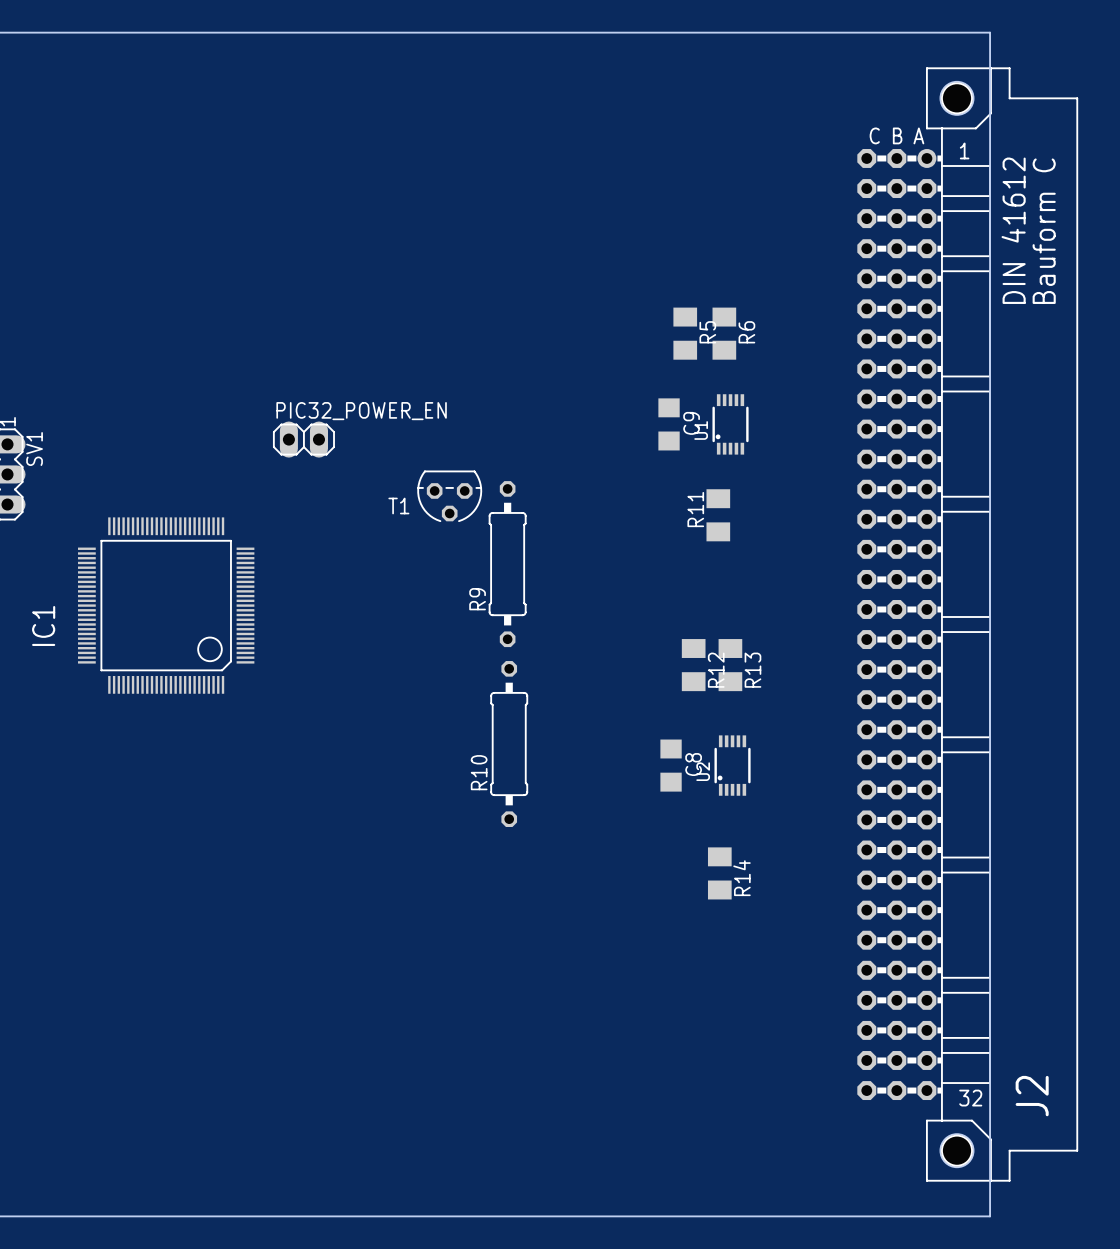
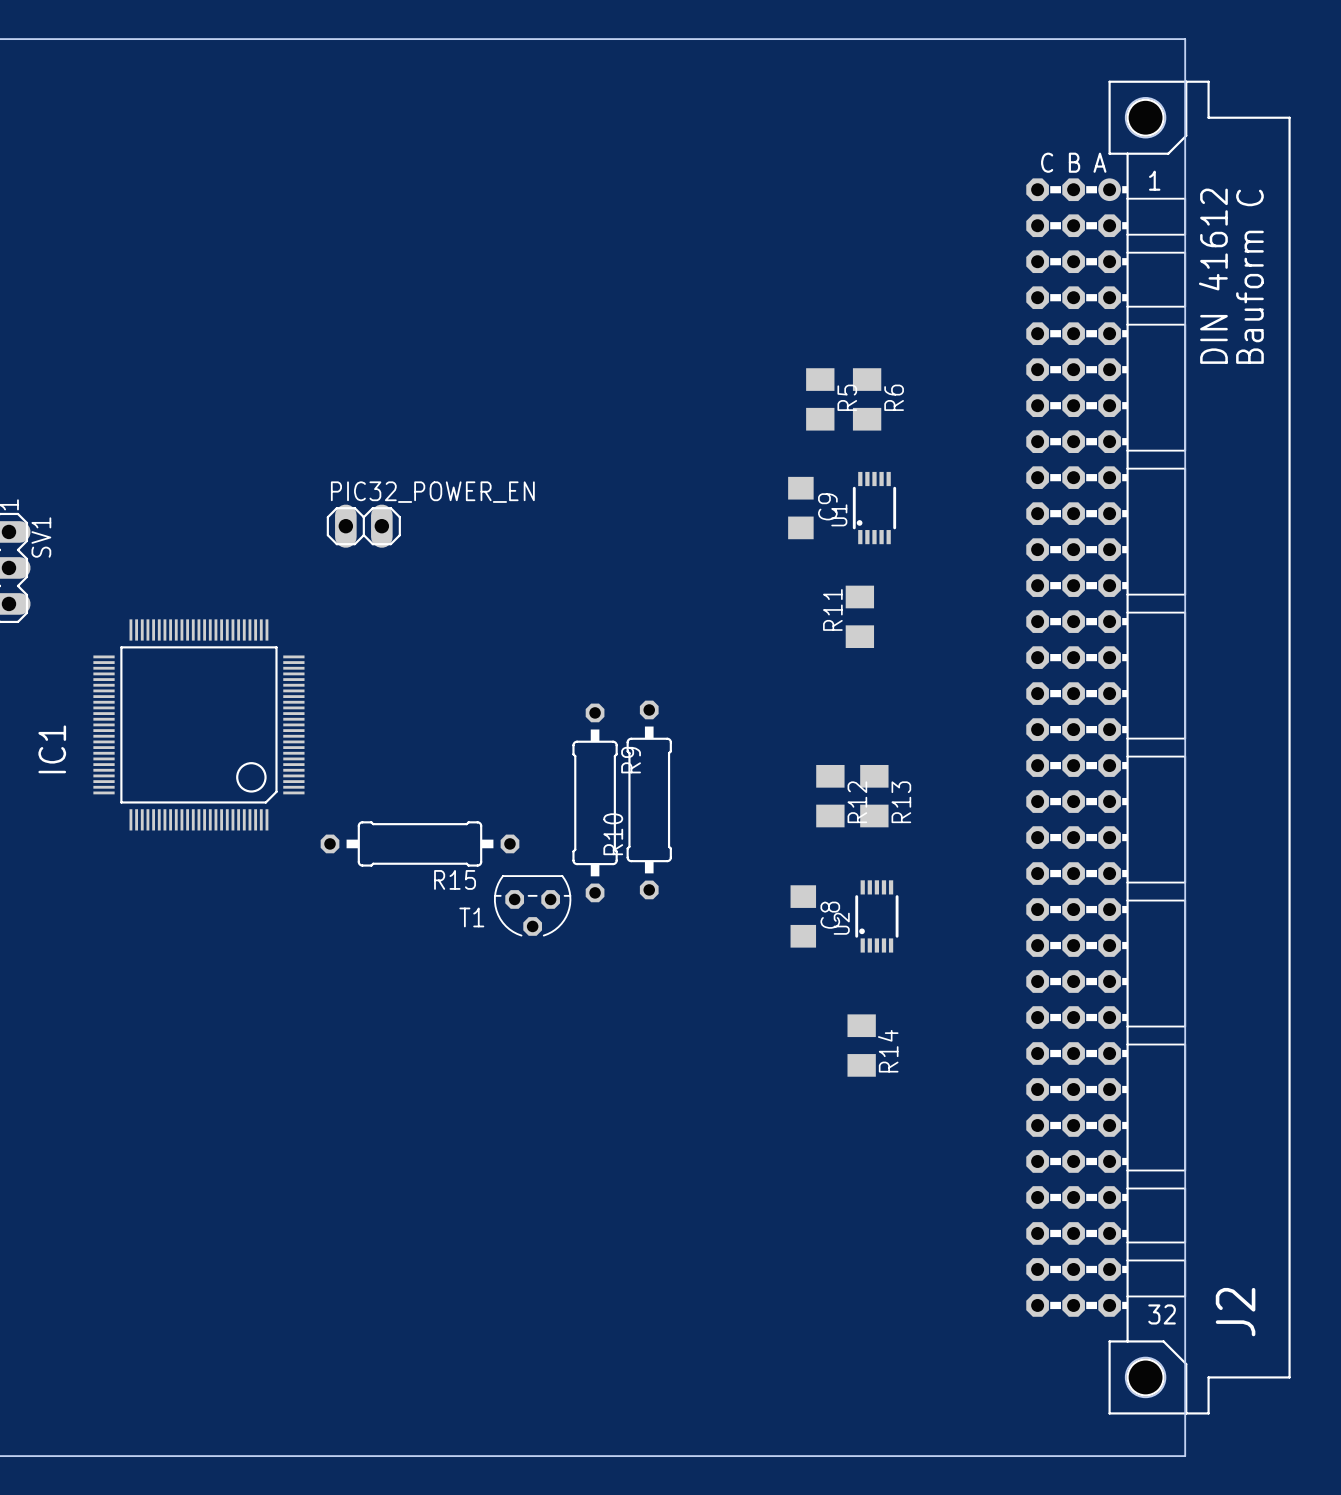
T1 position: (449, 496) -> (532, 905)
R9 position: (507, 564) -> (595, 802)
R9 name position: R9 (477, 599) -> R9 (631, 760)
R15: none -> (419, 843)
R10 position: (509, 744) -> (649, 799)

